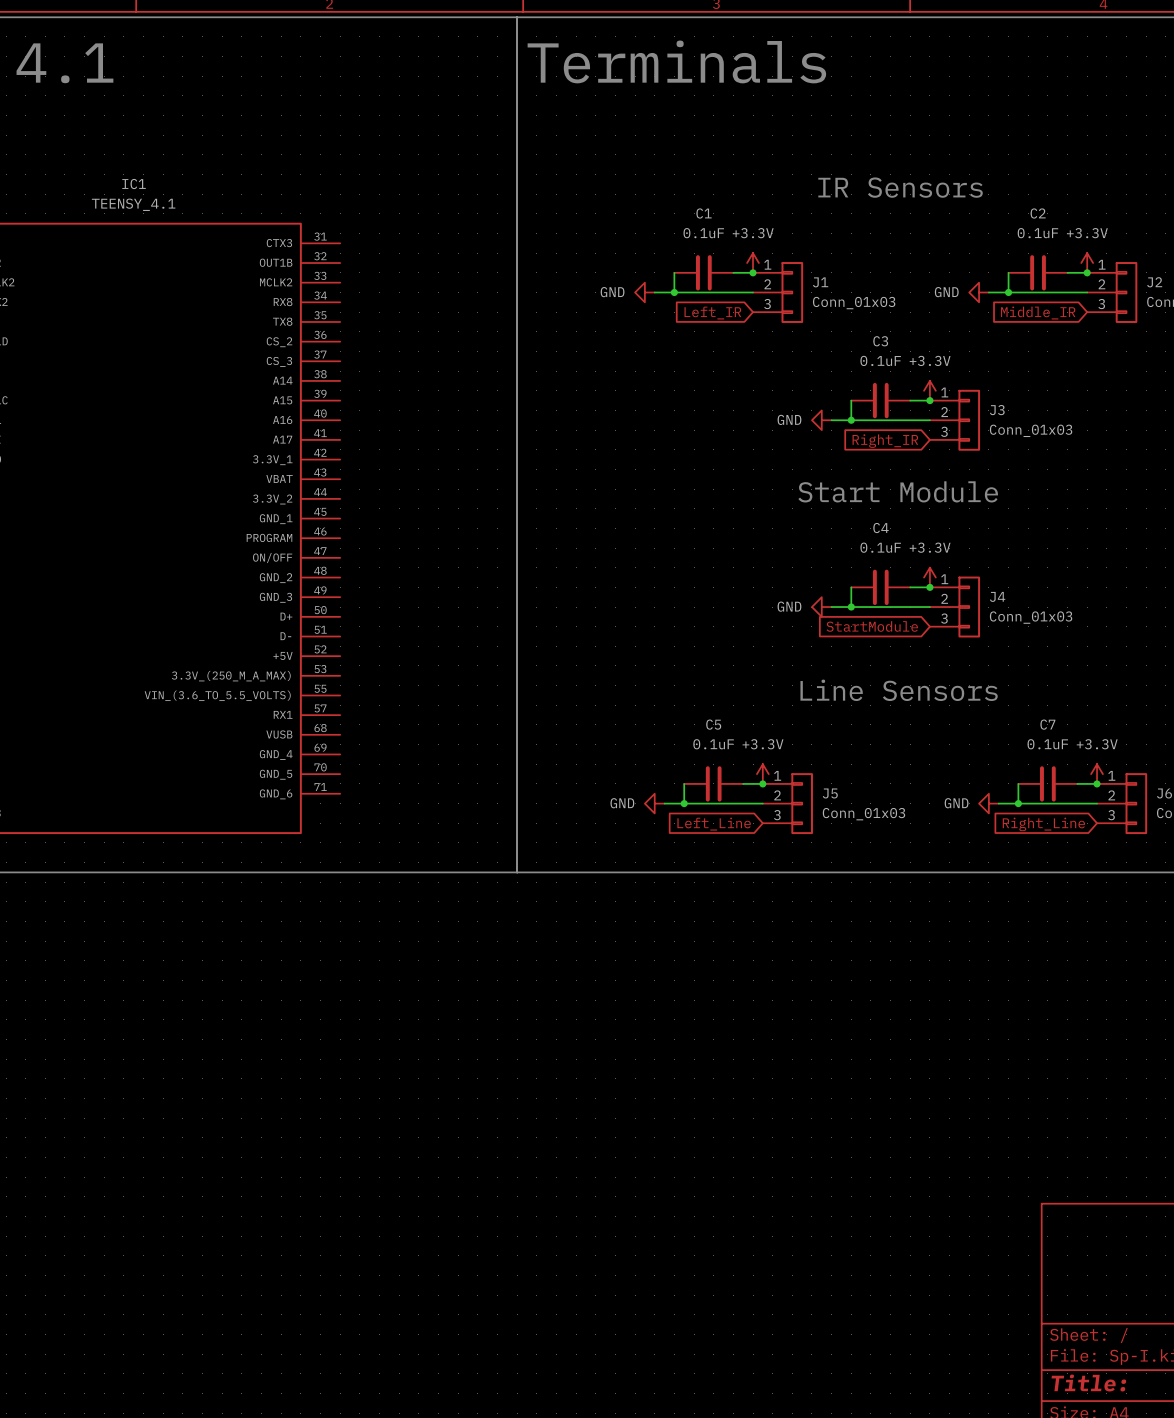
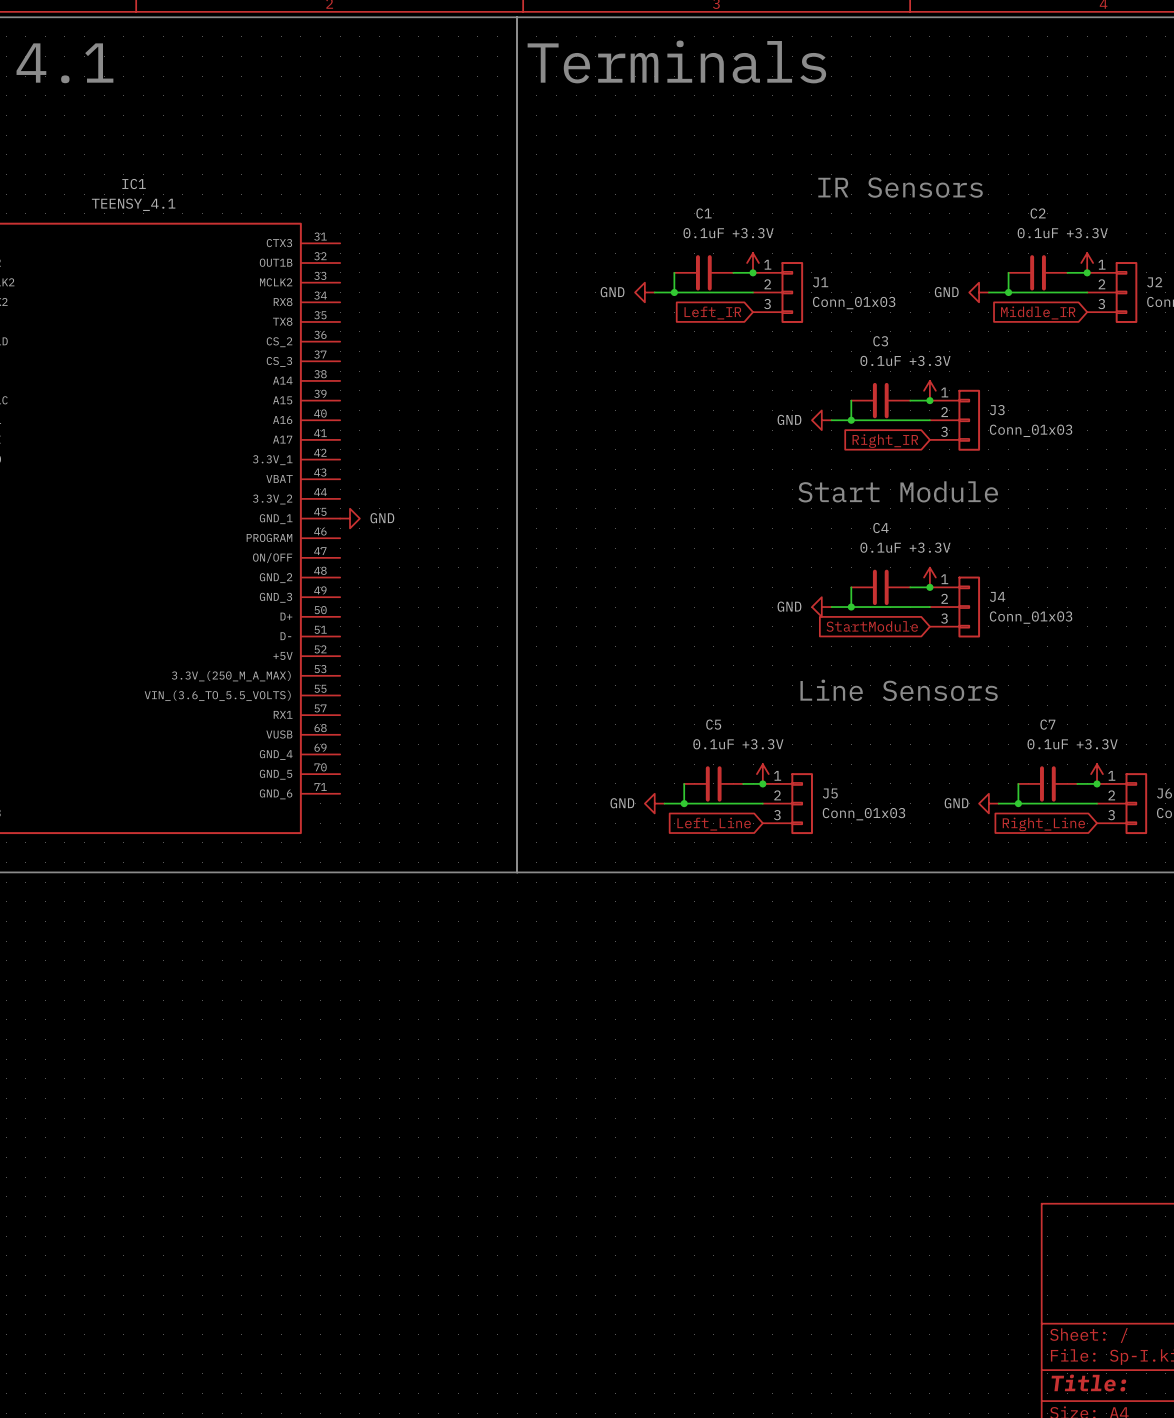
power symbol: none -> GND (350, 518)

